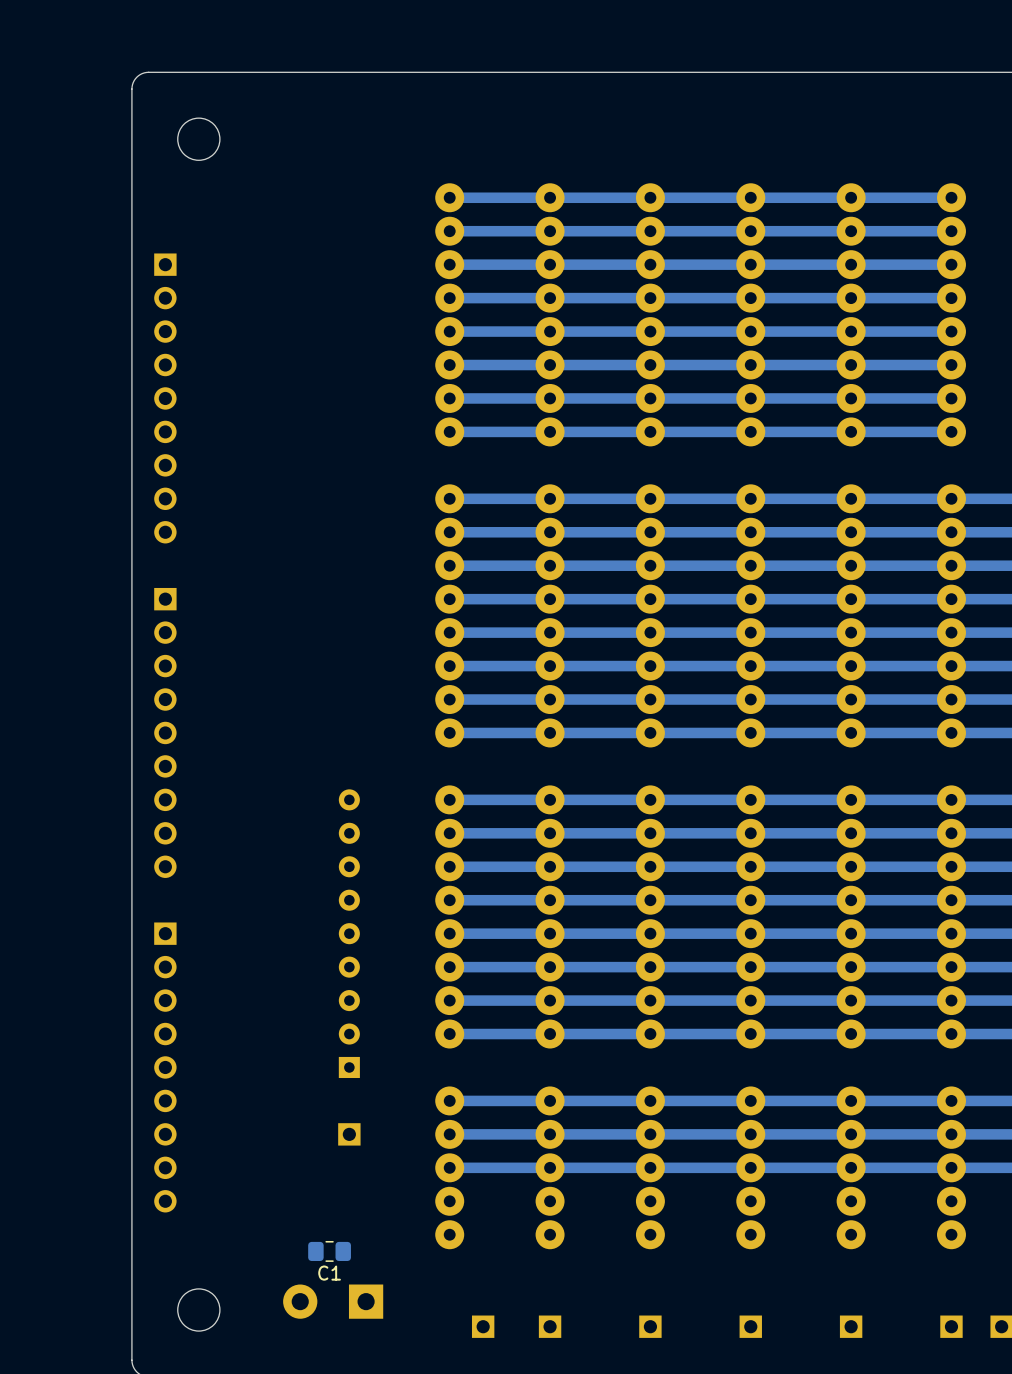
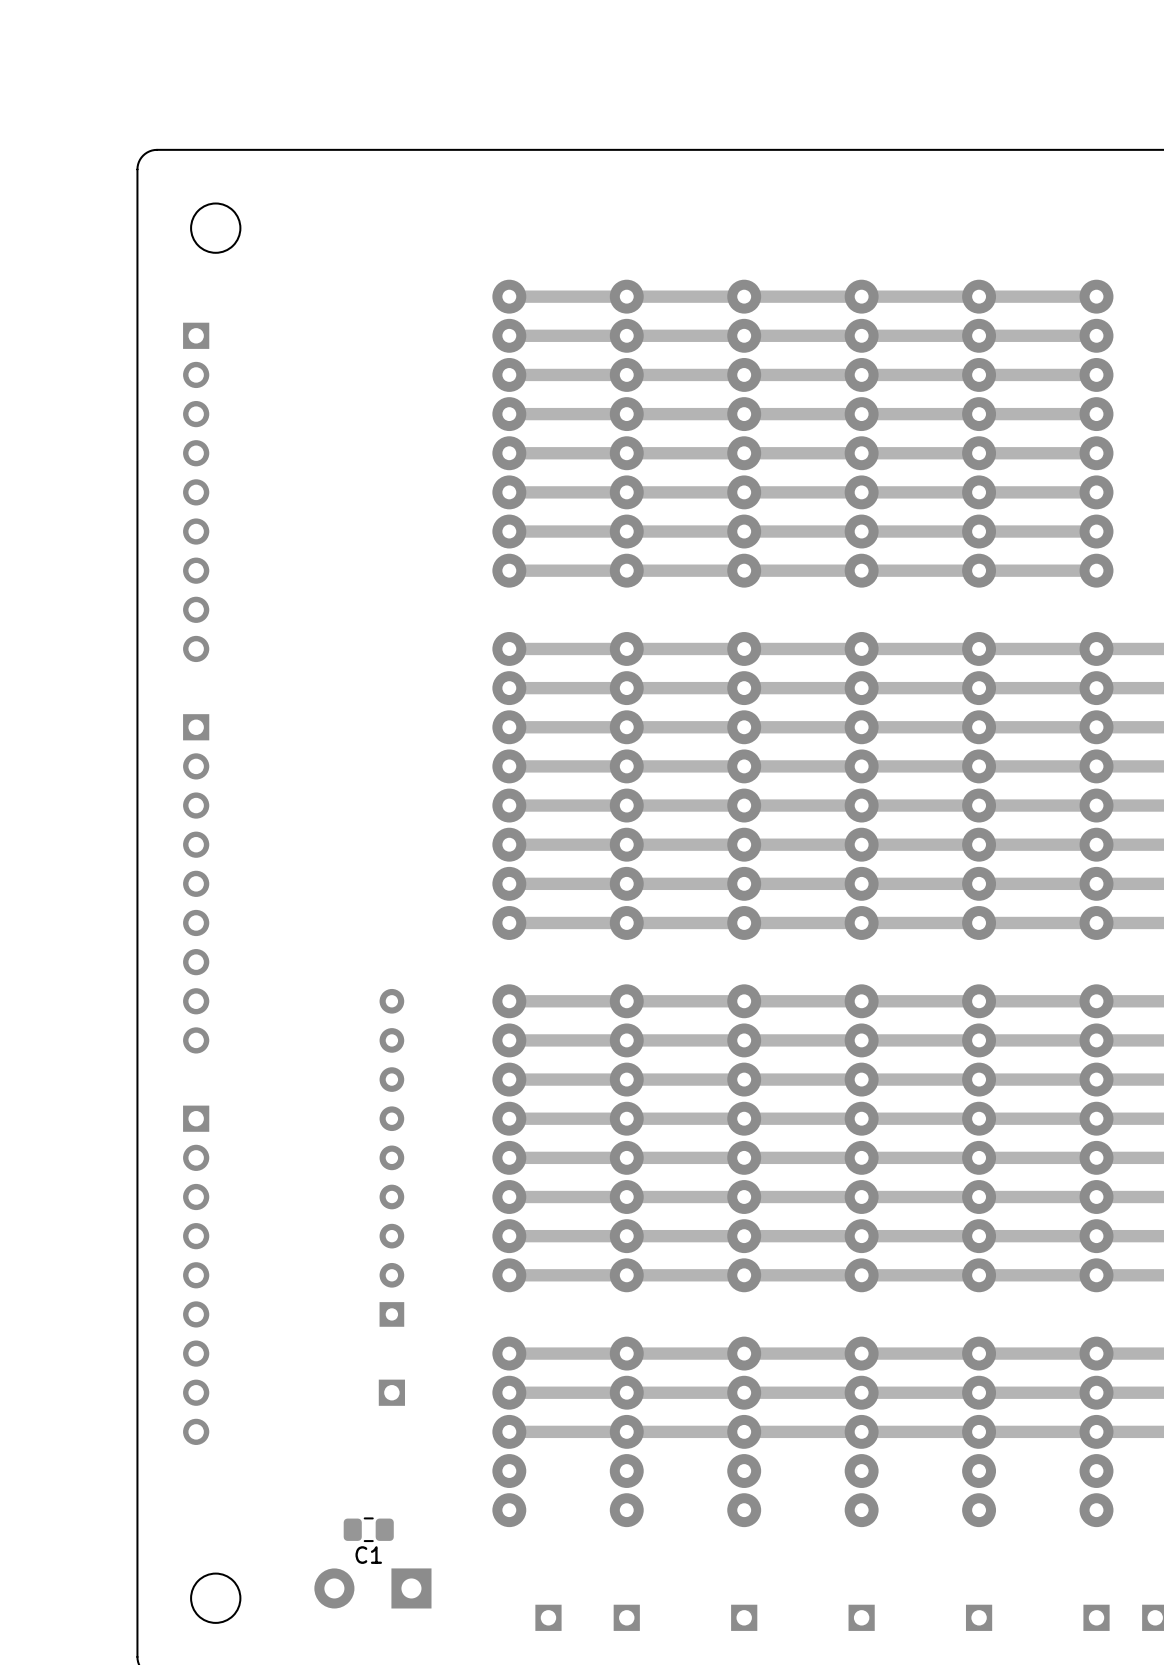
part position: (165, 398) -> (196, 492)
part position: (165, 732) -> (196, 883)
part position: (165, 1067) -> (196, 1275)

